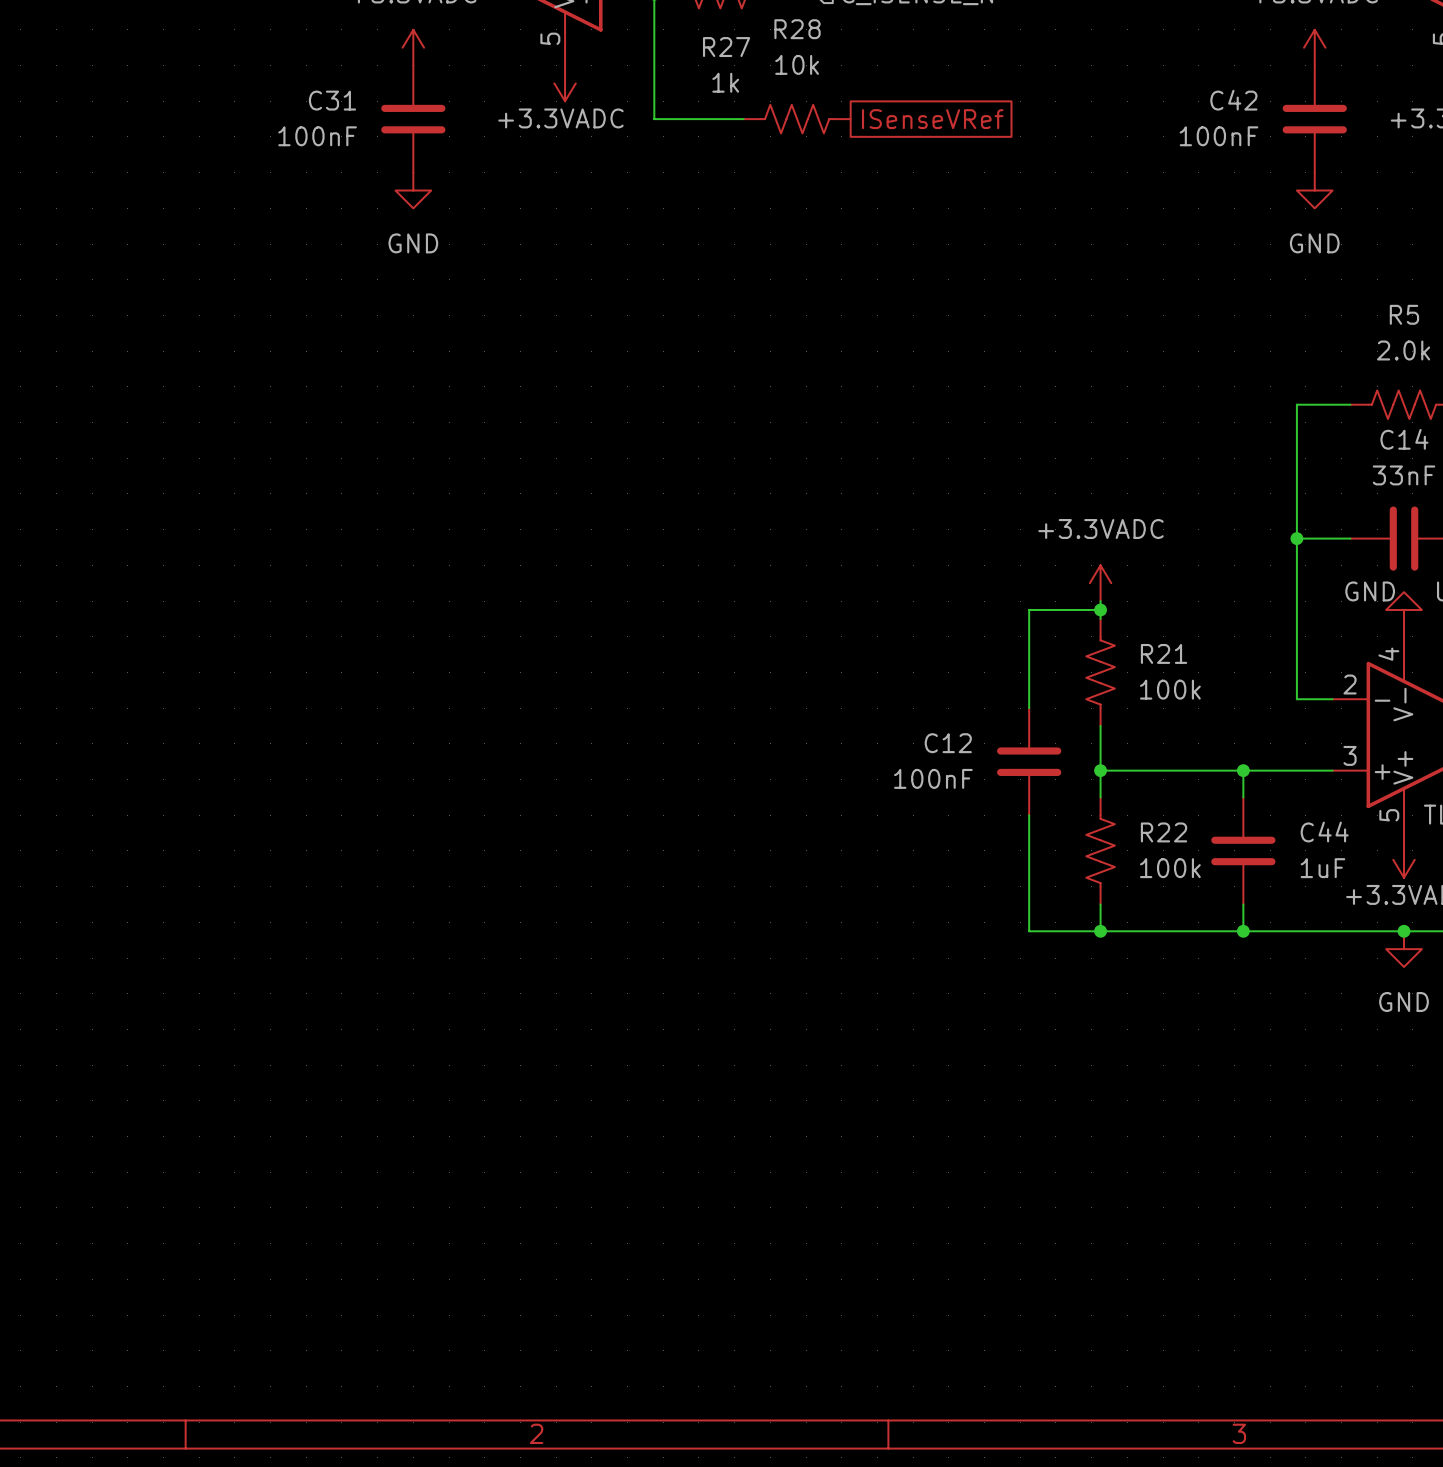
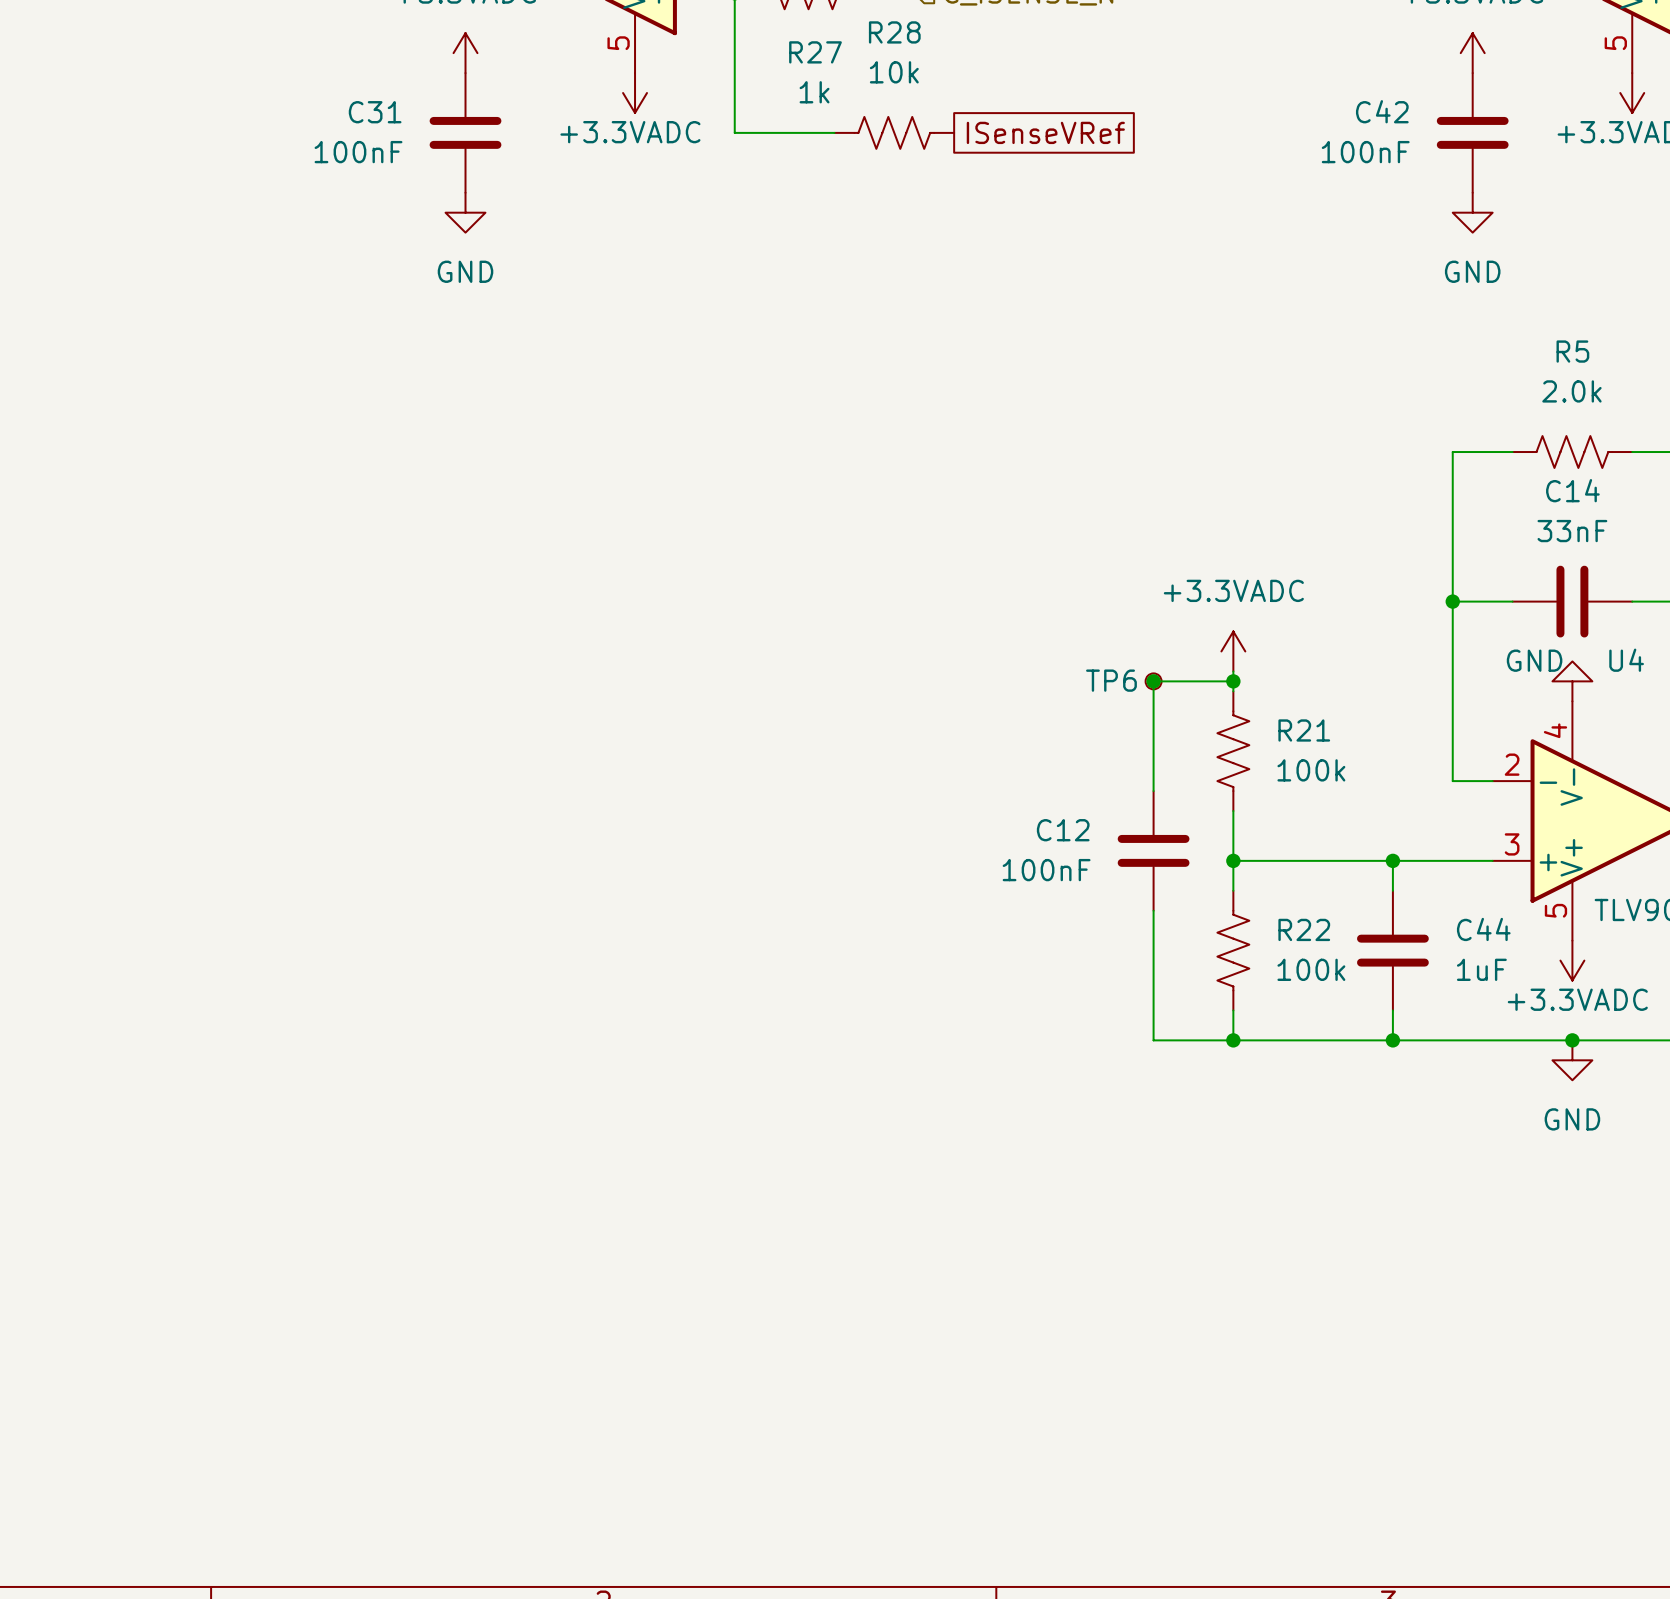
junction: none -> (1153, 681)
TP6: none -> (1153, 681)

